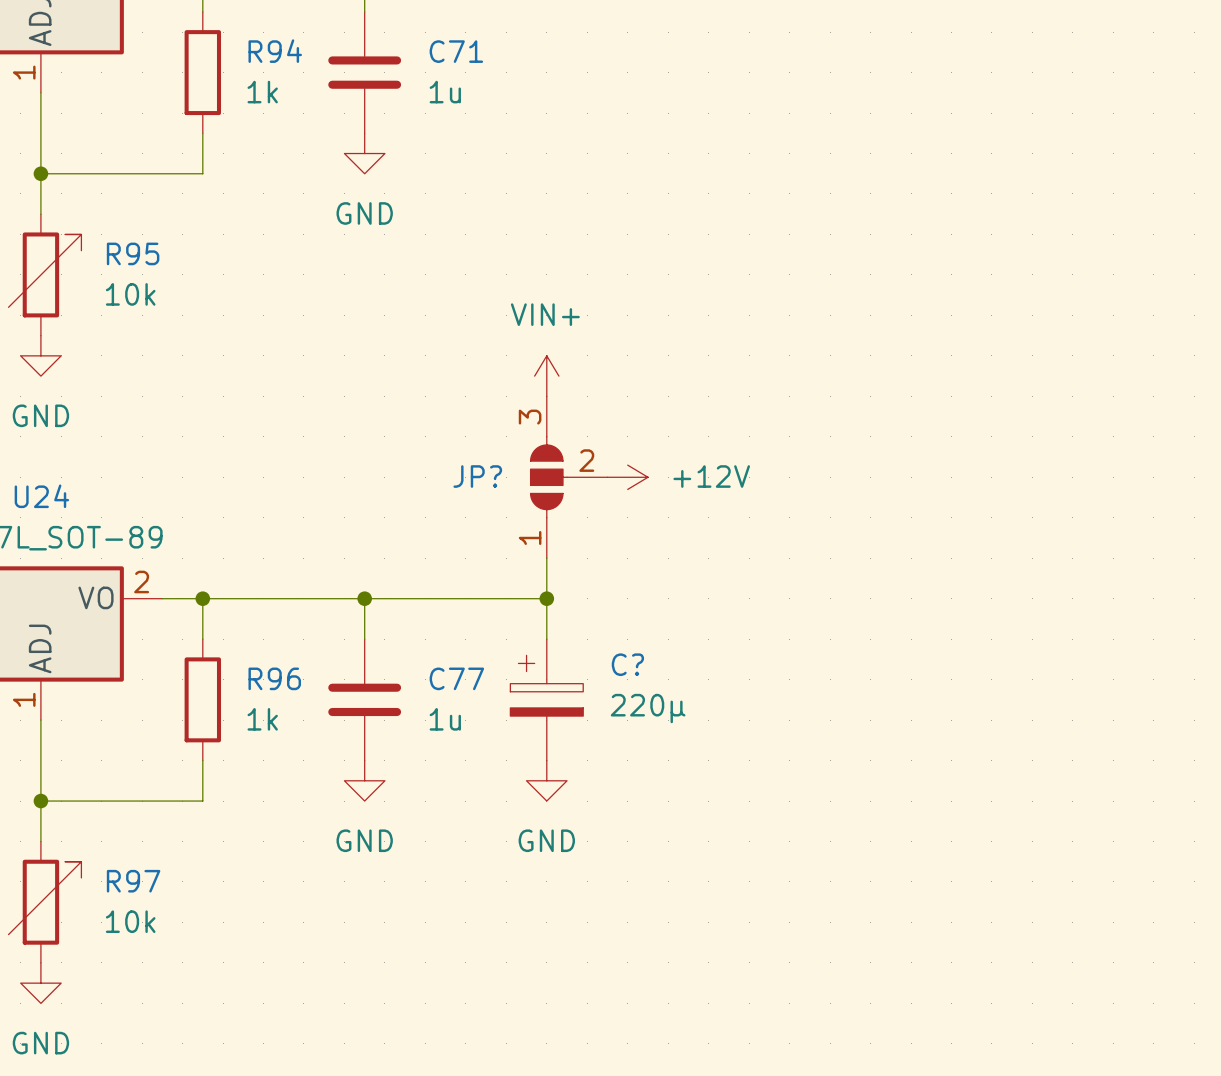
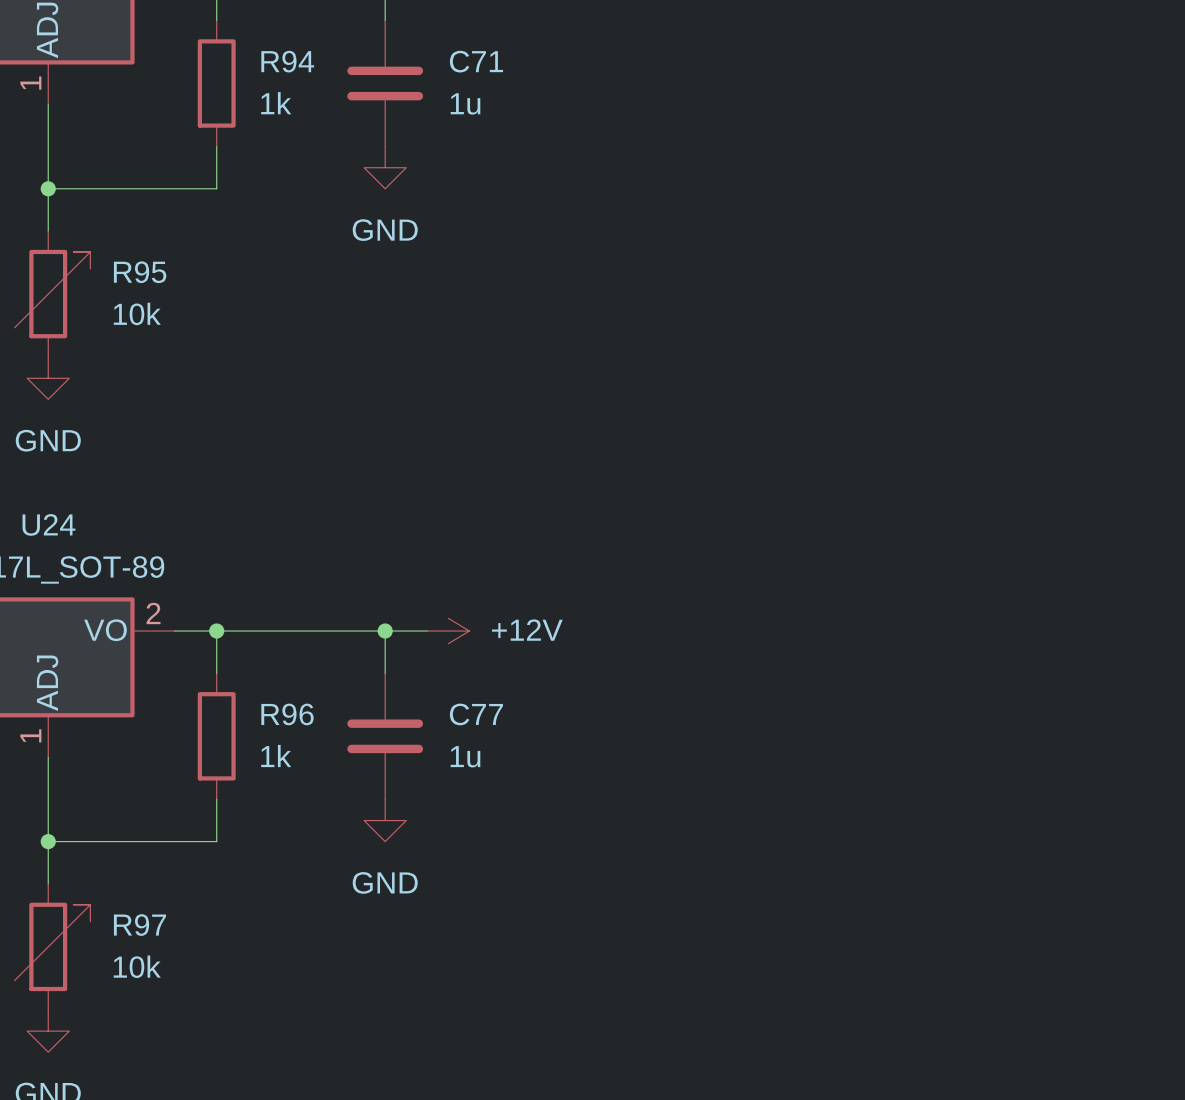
power symbol: VIN+ (546, 376) -> none
JP?: (569, 477) -> none
power symbol position: +12V (627, 477) -> +12V (448, 631)
wire: (546, 558) (546, 639) -> none
wire: (405, 598) (546, 598) -> none
junction: (546, 598) -> none
C?: 220µ (546, 699) -> none
power symbol: GND (546, 780) -> none

